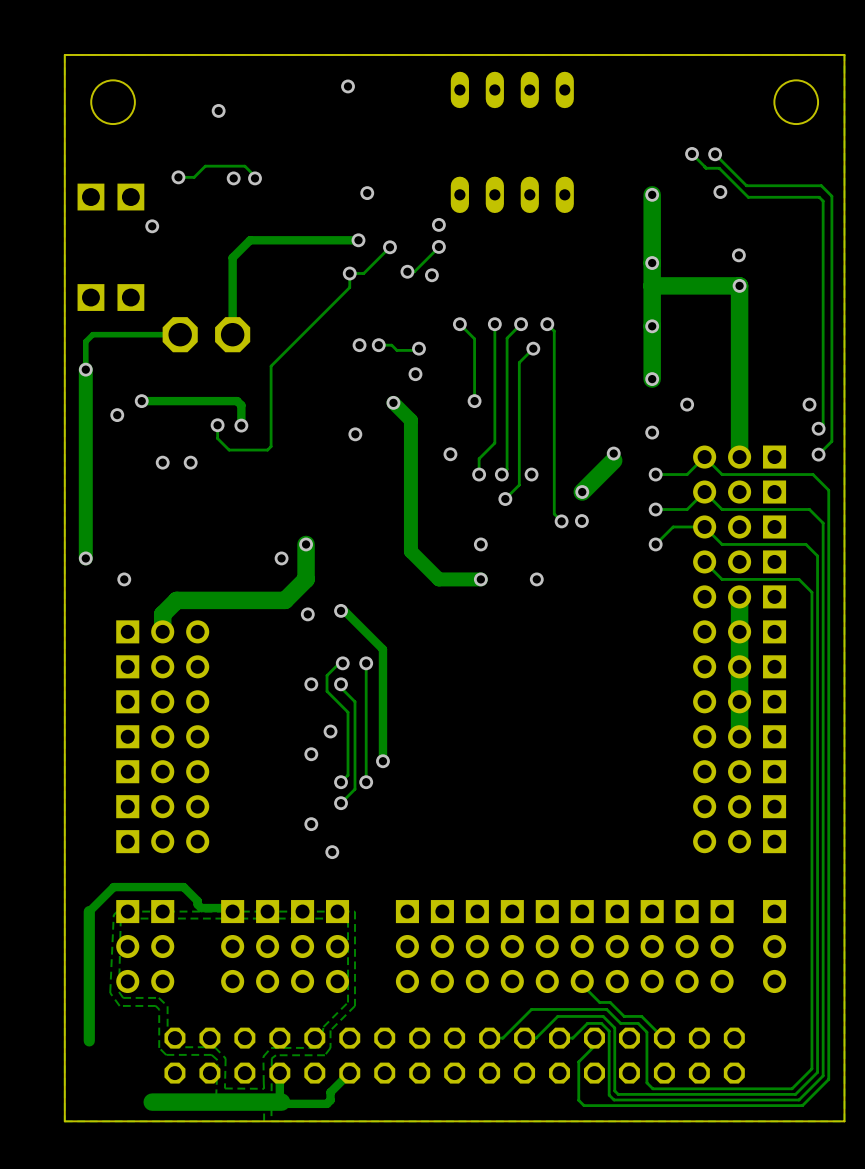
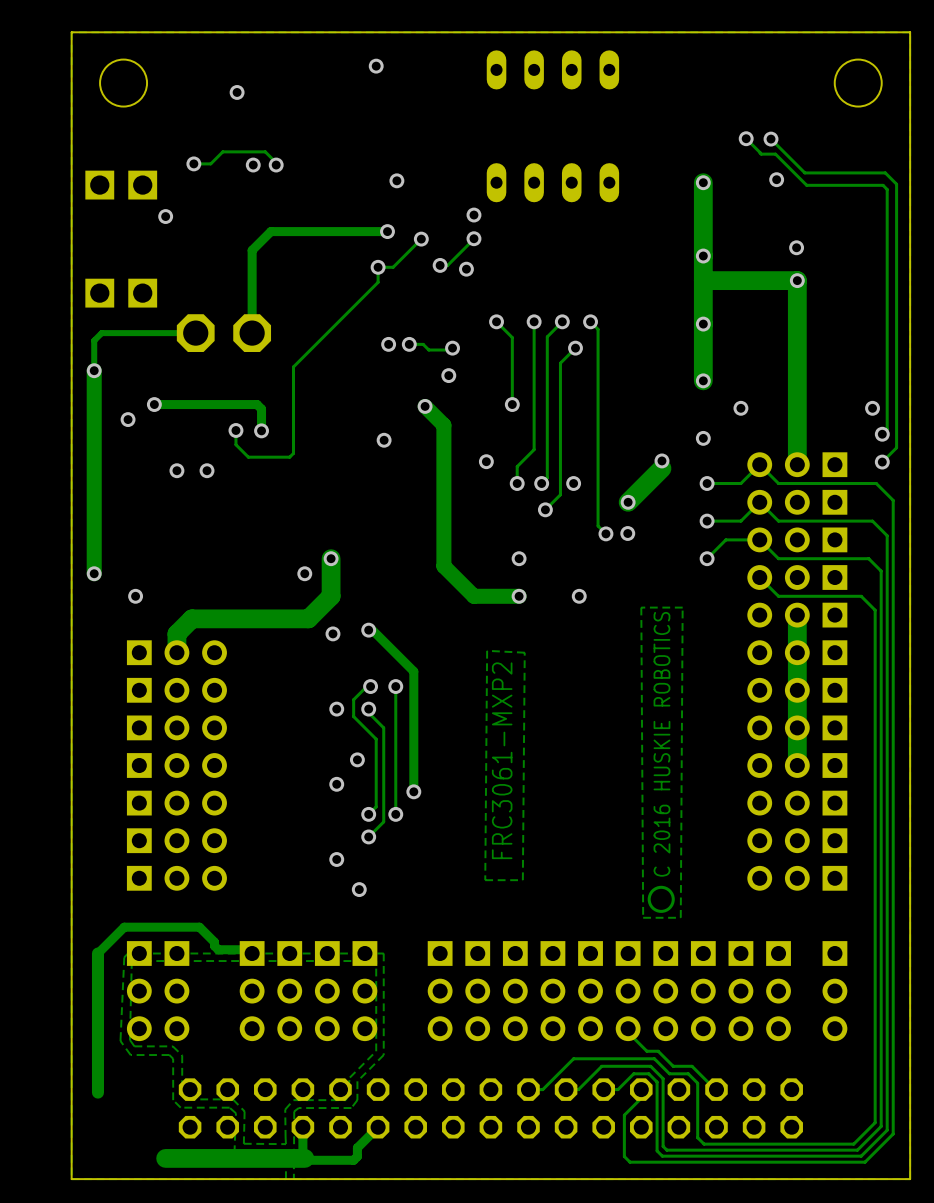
zone outline: none -> (682, 607) (641, 607) (643, 917) (680, 917) (682, 607)
zone outline: none -> (487, 650) (524, 652) (522, 880) (485, 880) (487, 650)
text: none -> C 2016 HUSKIE ROBOTICS (661, 744)
text: none -> FRC3061-MXP2 (502, 760)
drawing: none -> [647, 885, 675, 913]

